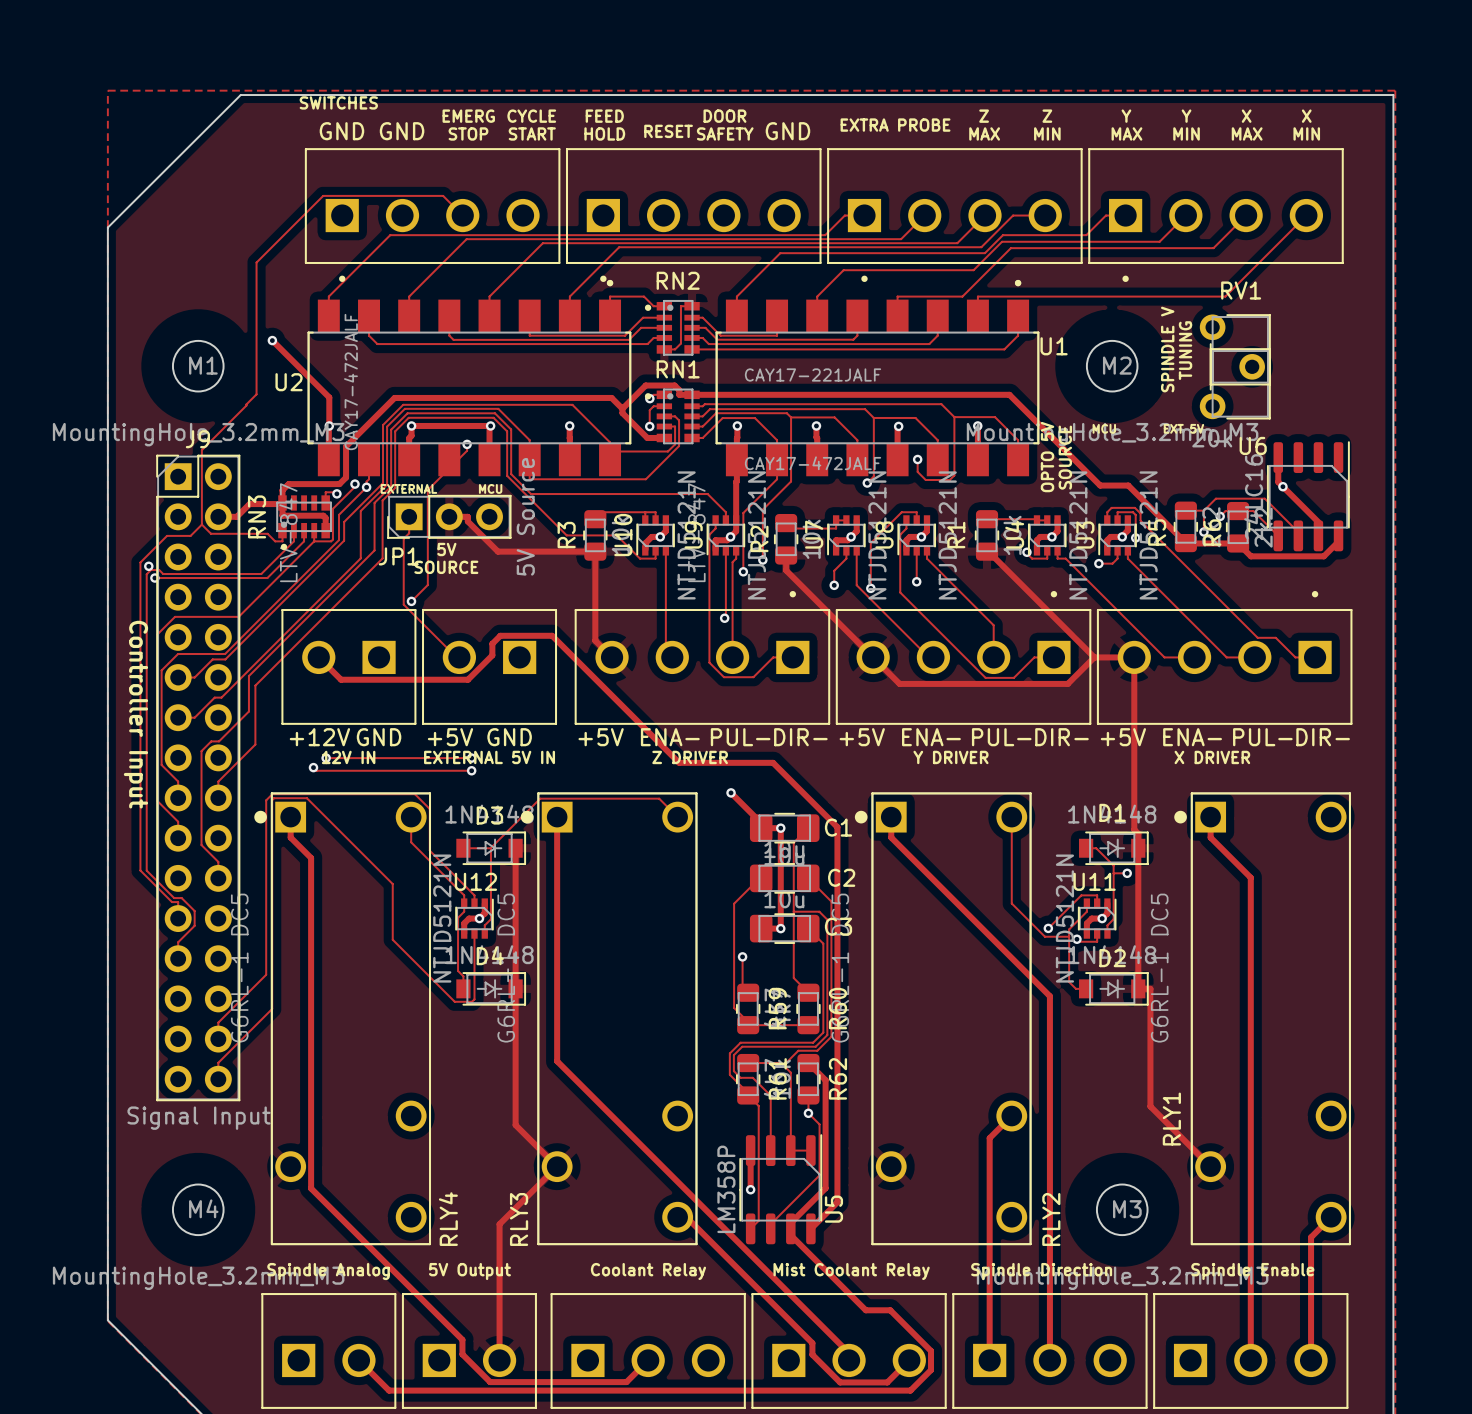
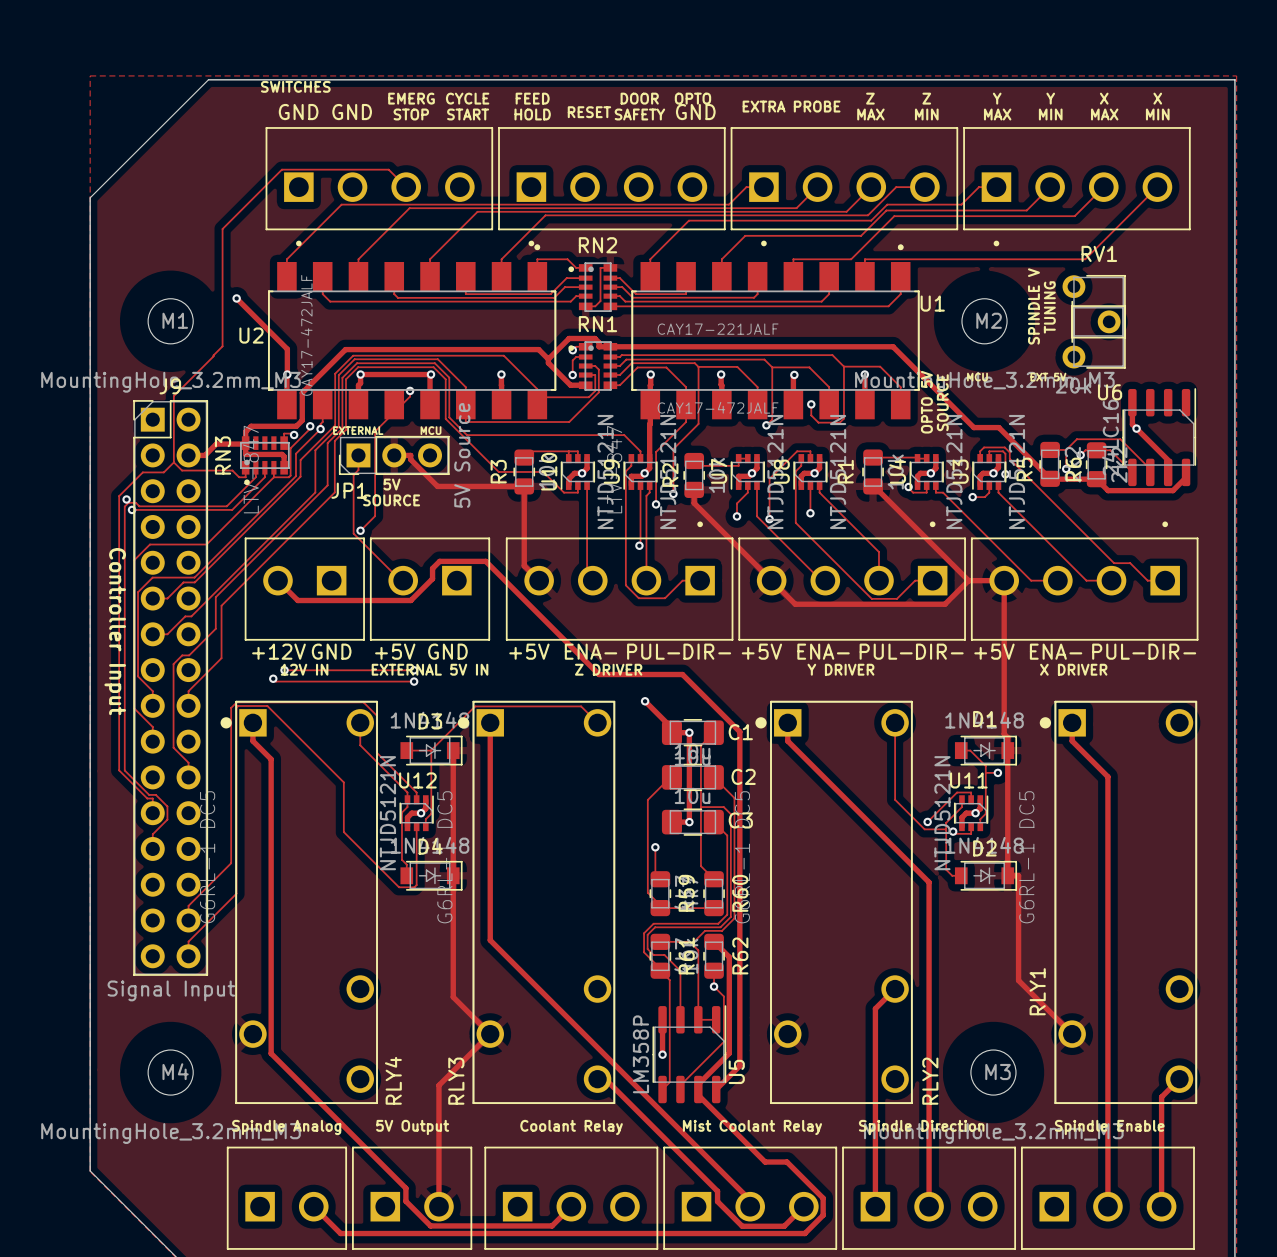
text: none -> OPTO (692, 98)

